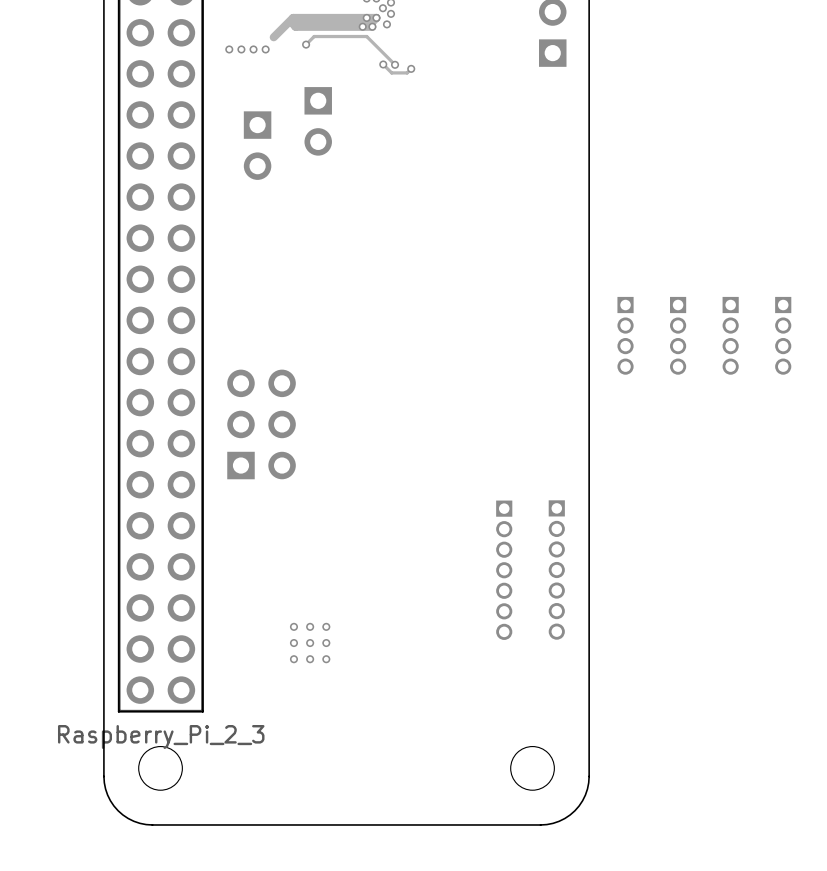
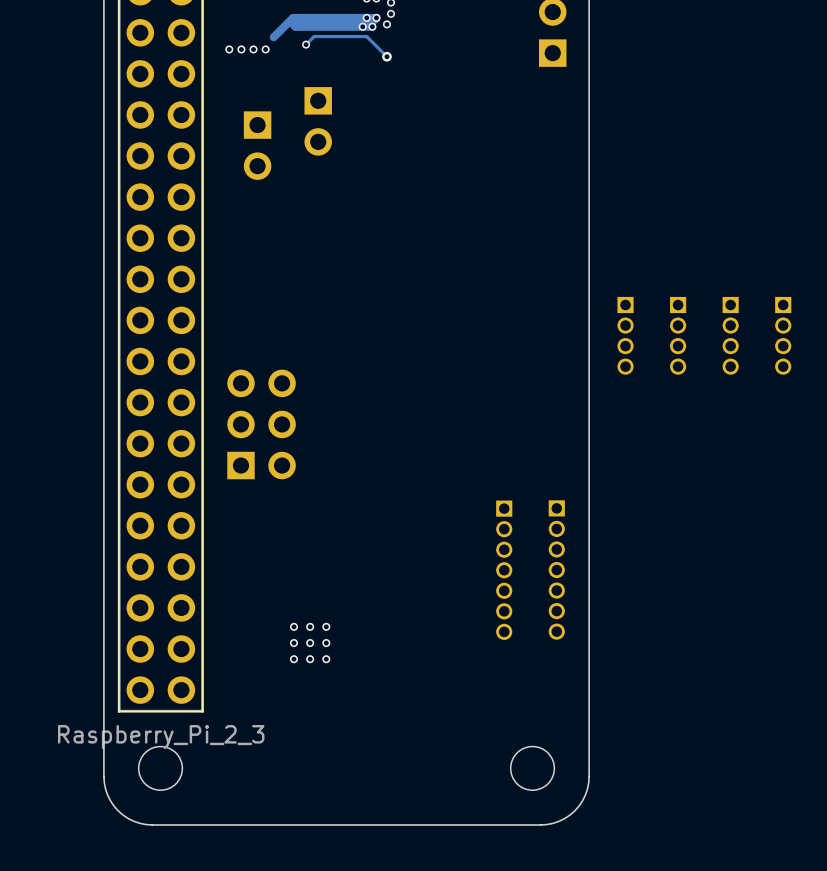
via: (382, 8) -> none
track: (386, 56) (395, 64) -> none
via: none -> (386, 56)
track: (383, 64) (391, 72) (407, 72) (411, 68) -> none
via: (383, 64) -> none
via: (395, 64) -> none
via: (411, 68) -> none

